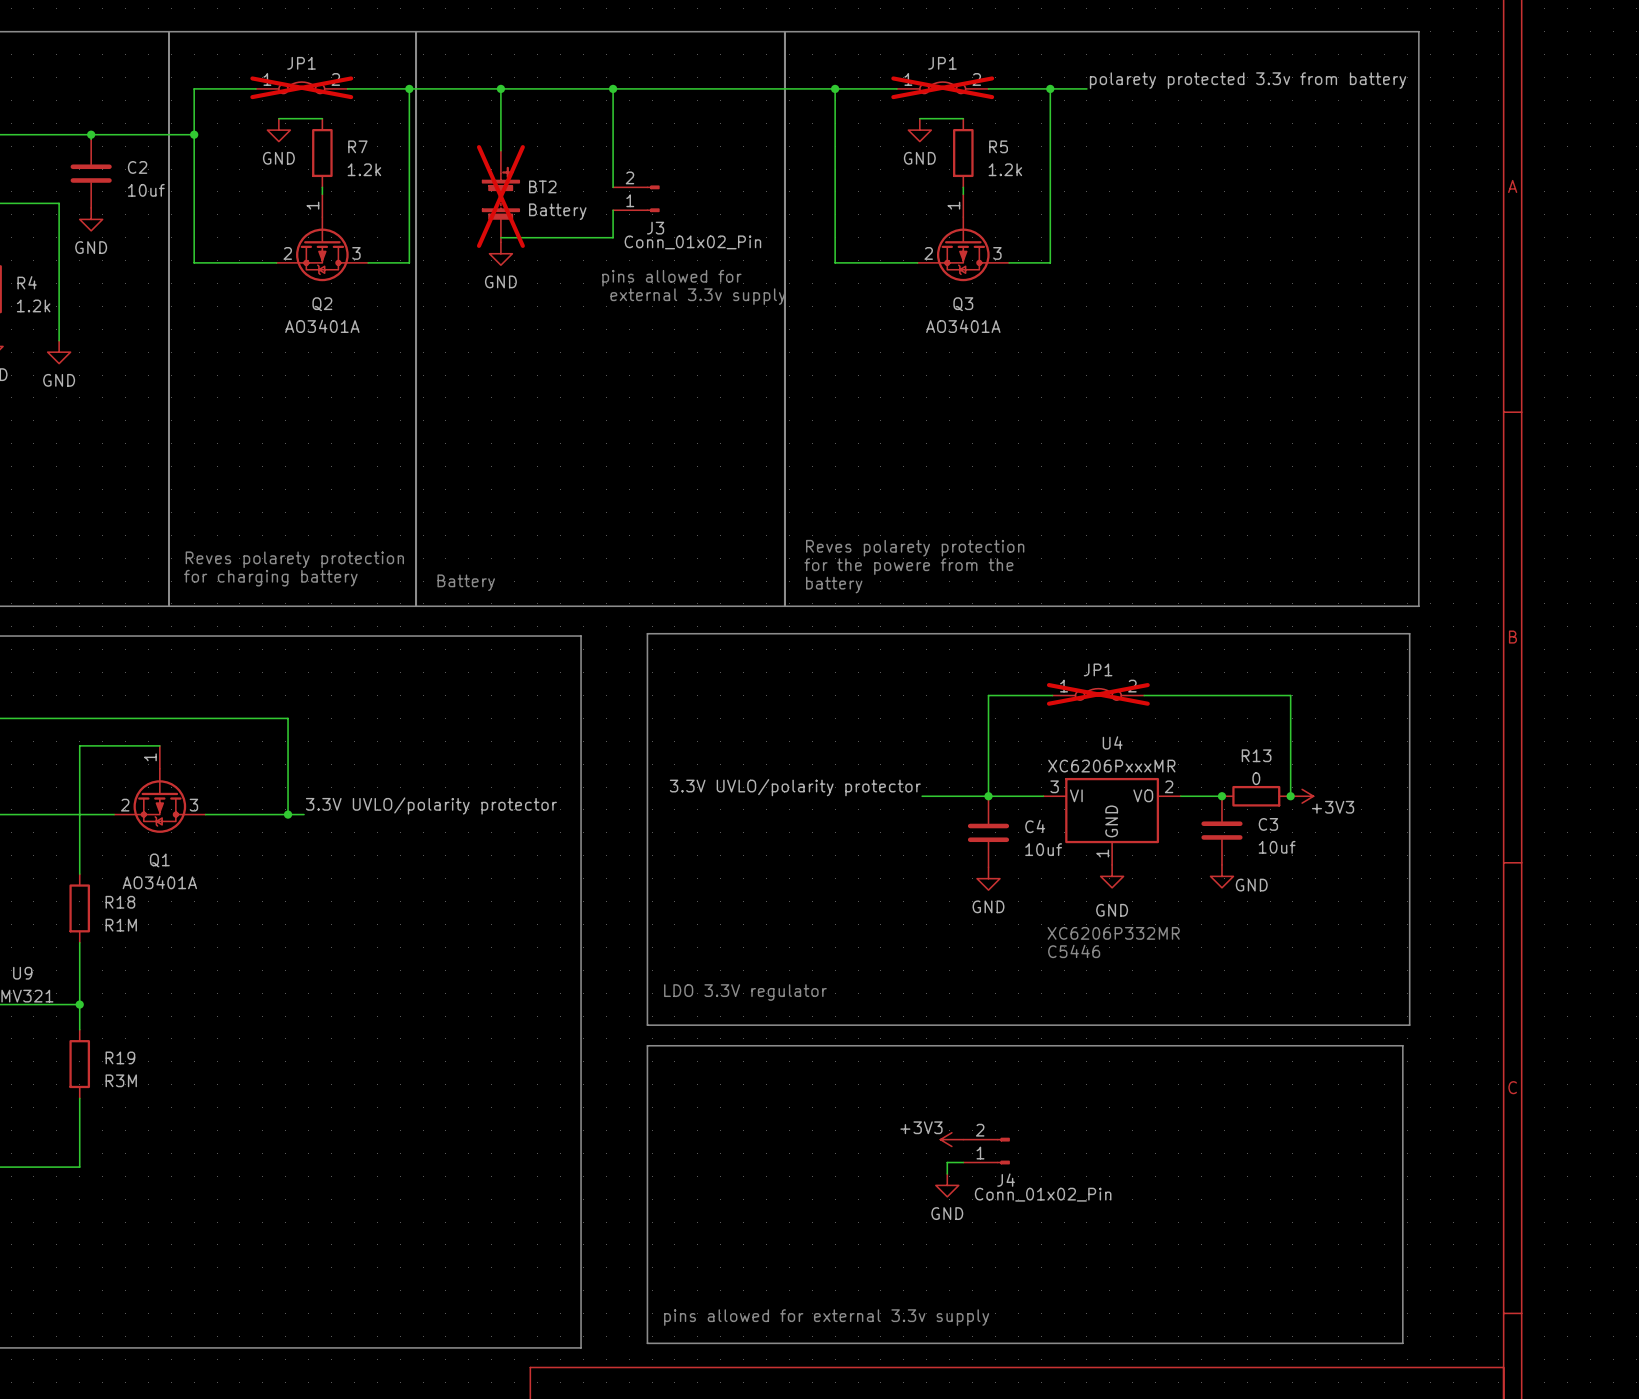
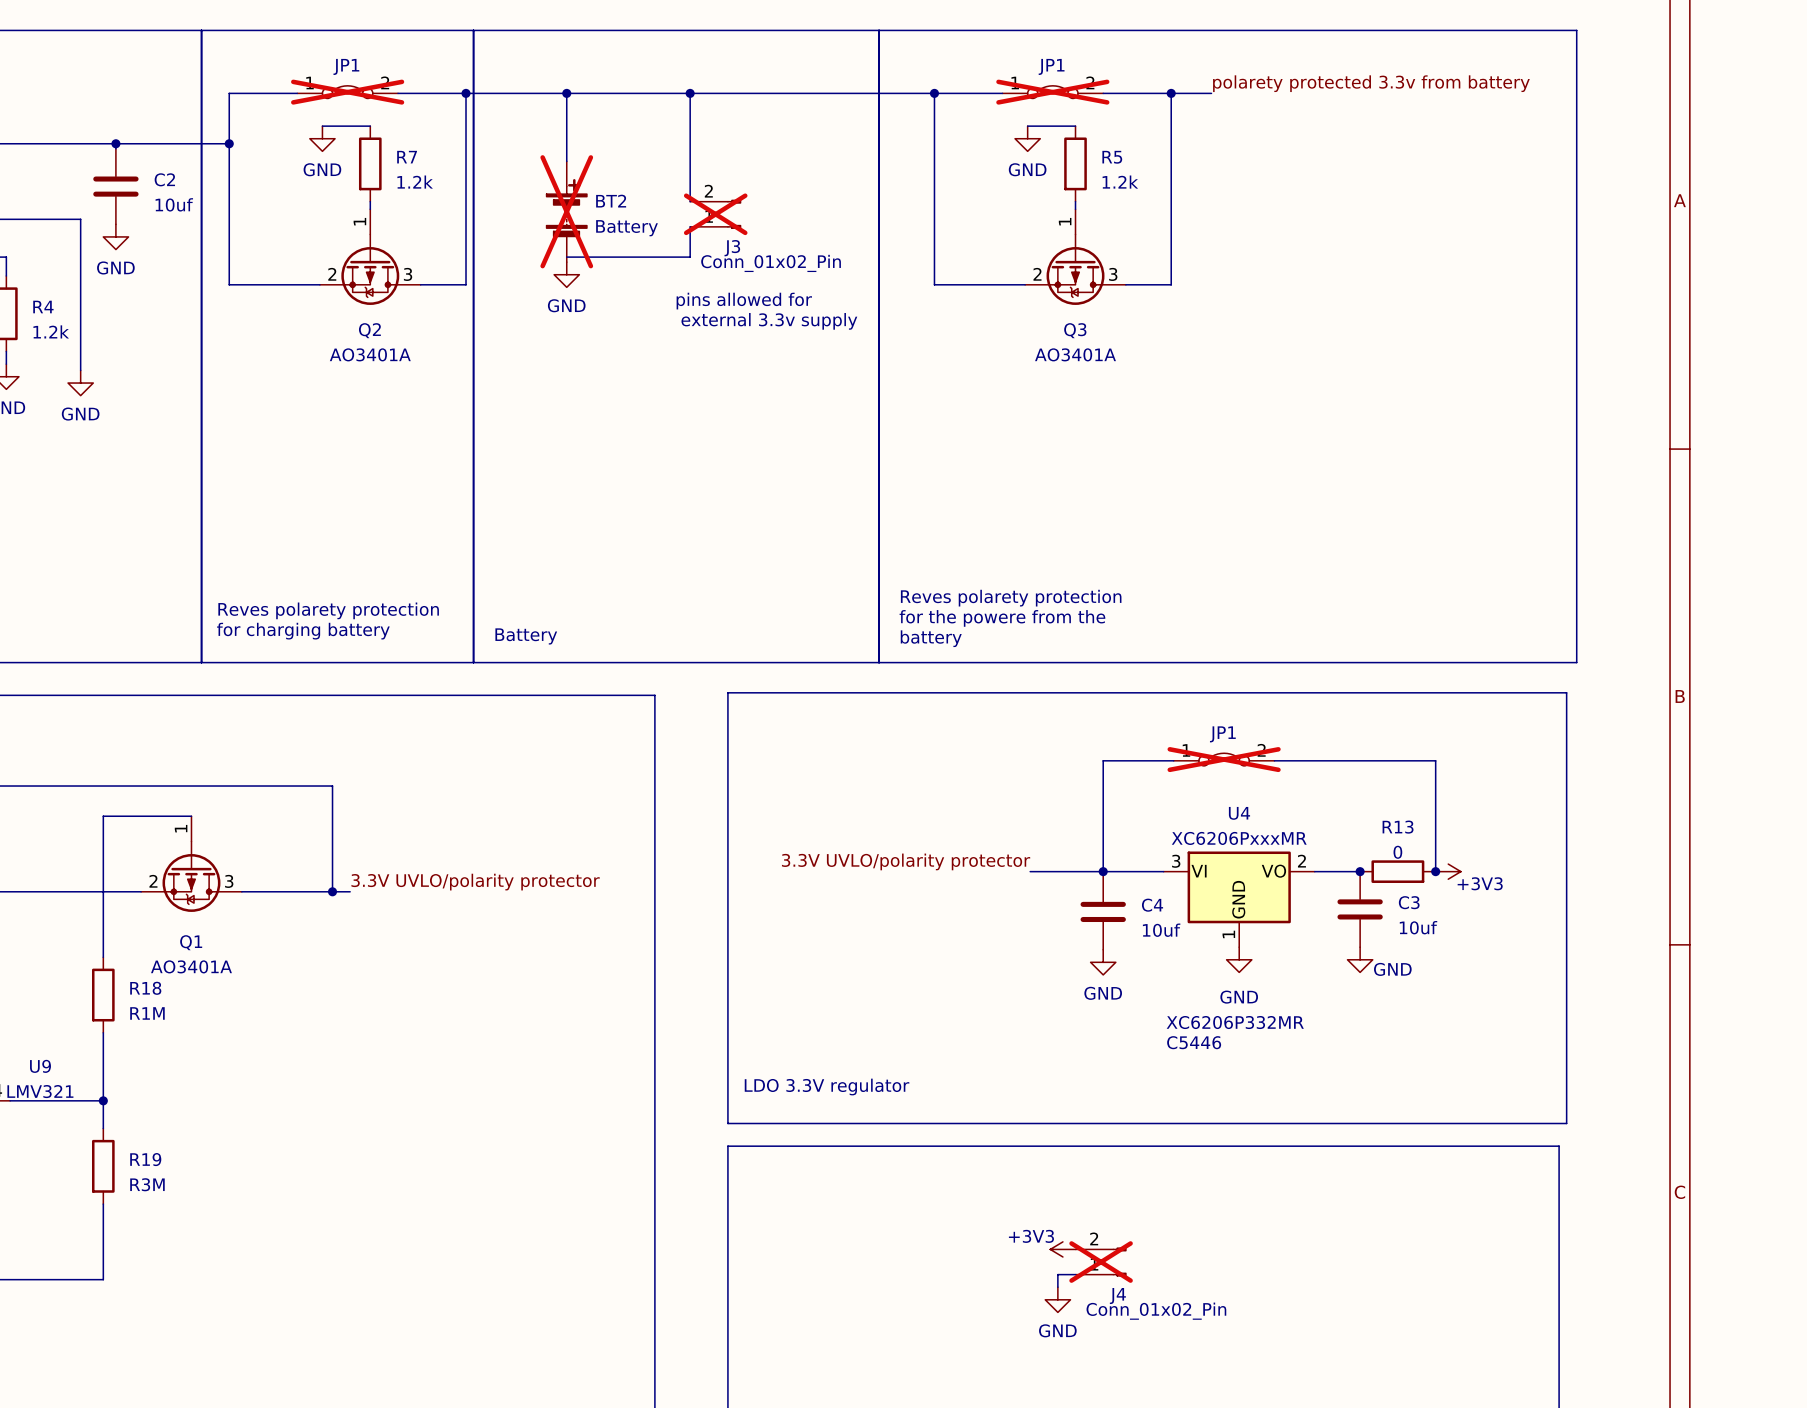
J3 do-not-place cross: none -> (715, 214)
J4 do-not-place cross: none -> (1101, 1262)

